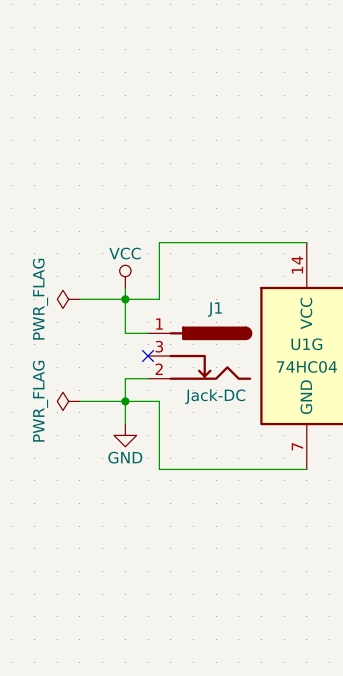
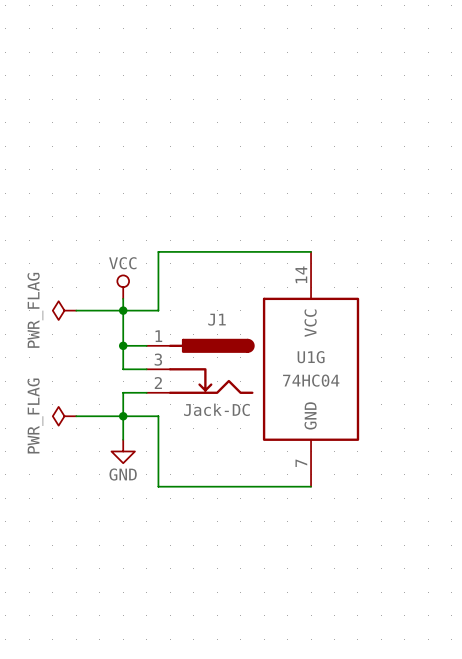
wire: none -> (123, 345) (123, 369) (146, 369)
junction: none -> (123, 345)
no-connect mark: (148, 356) -> none

